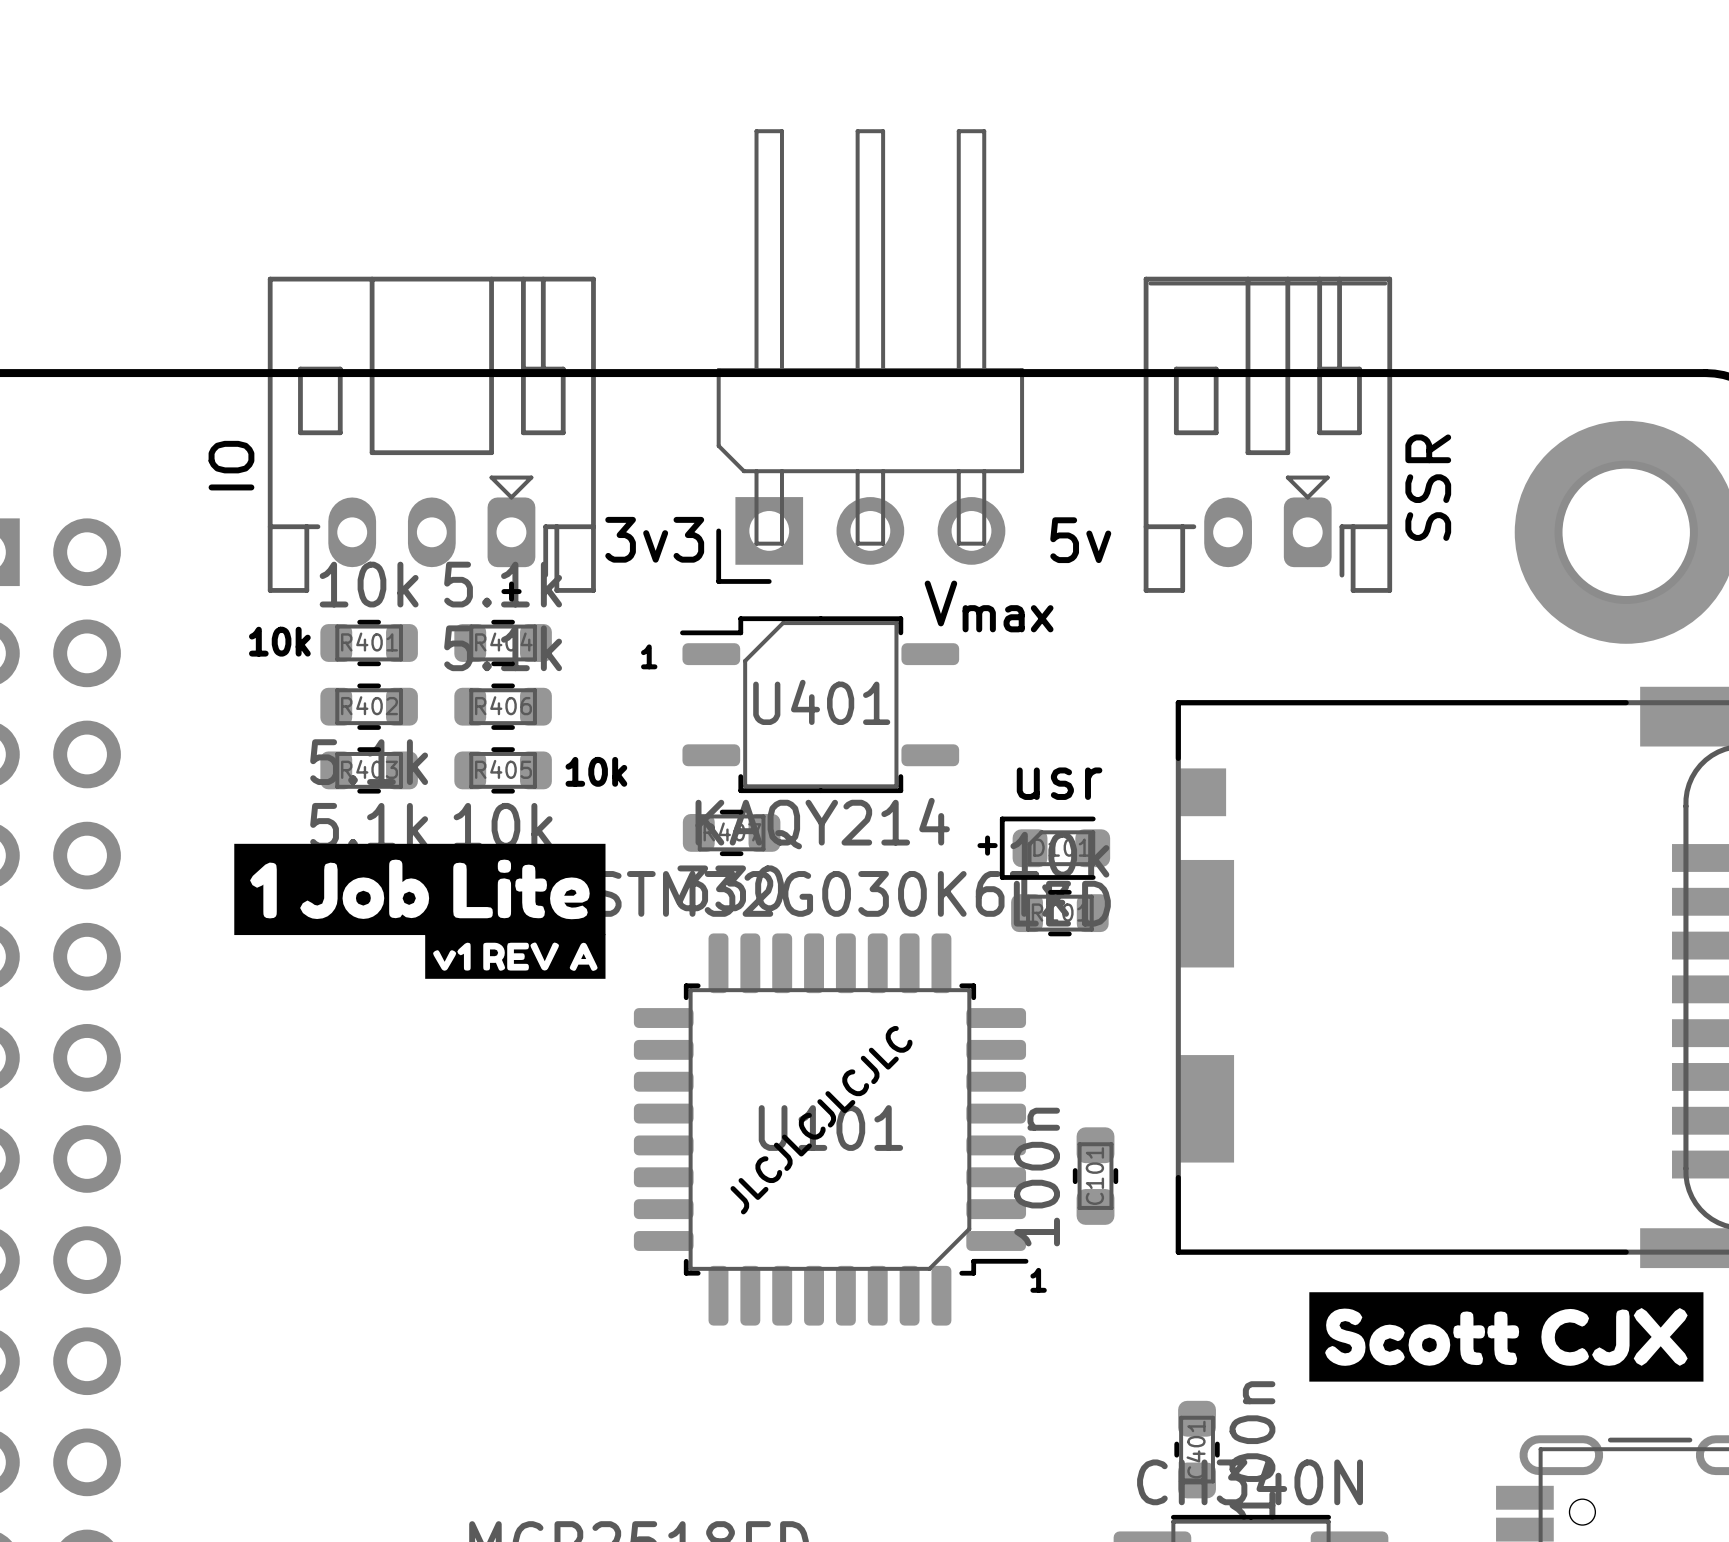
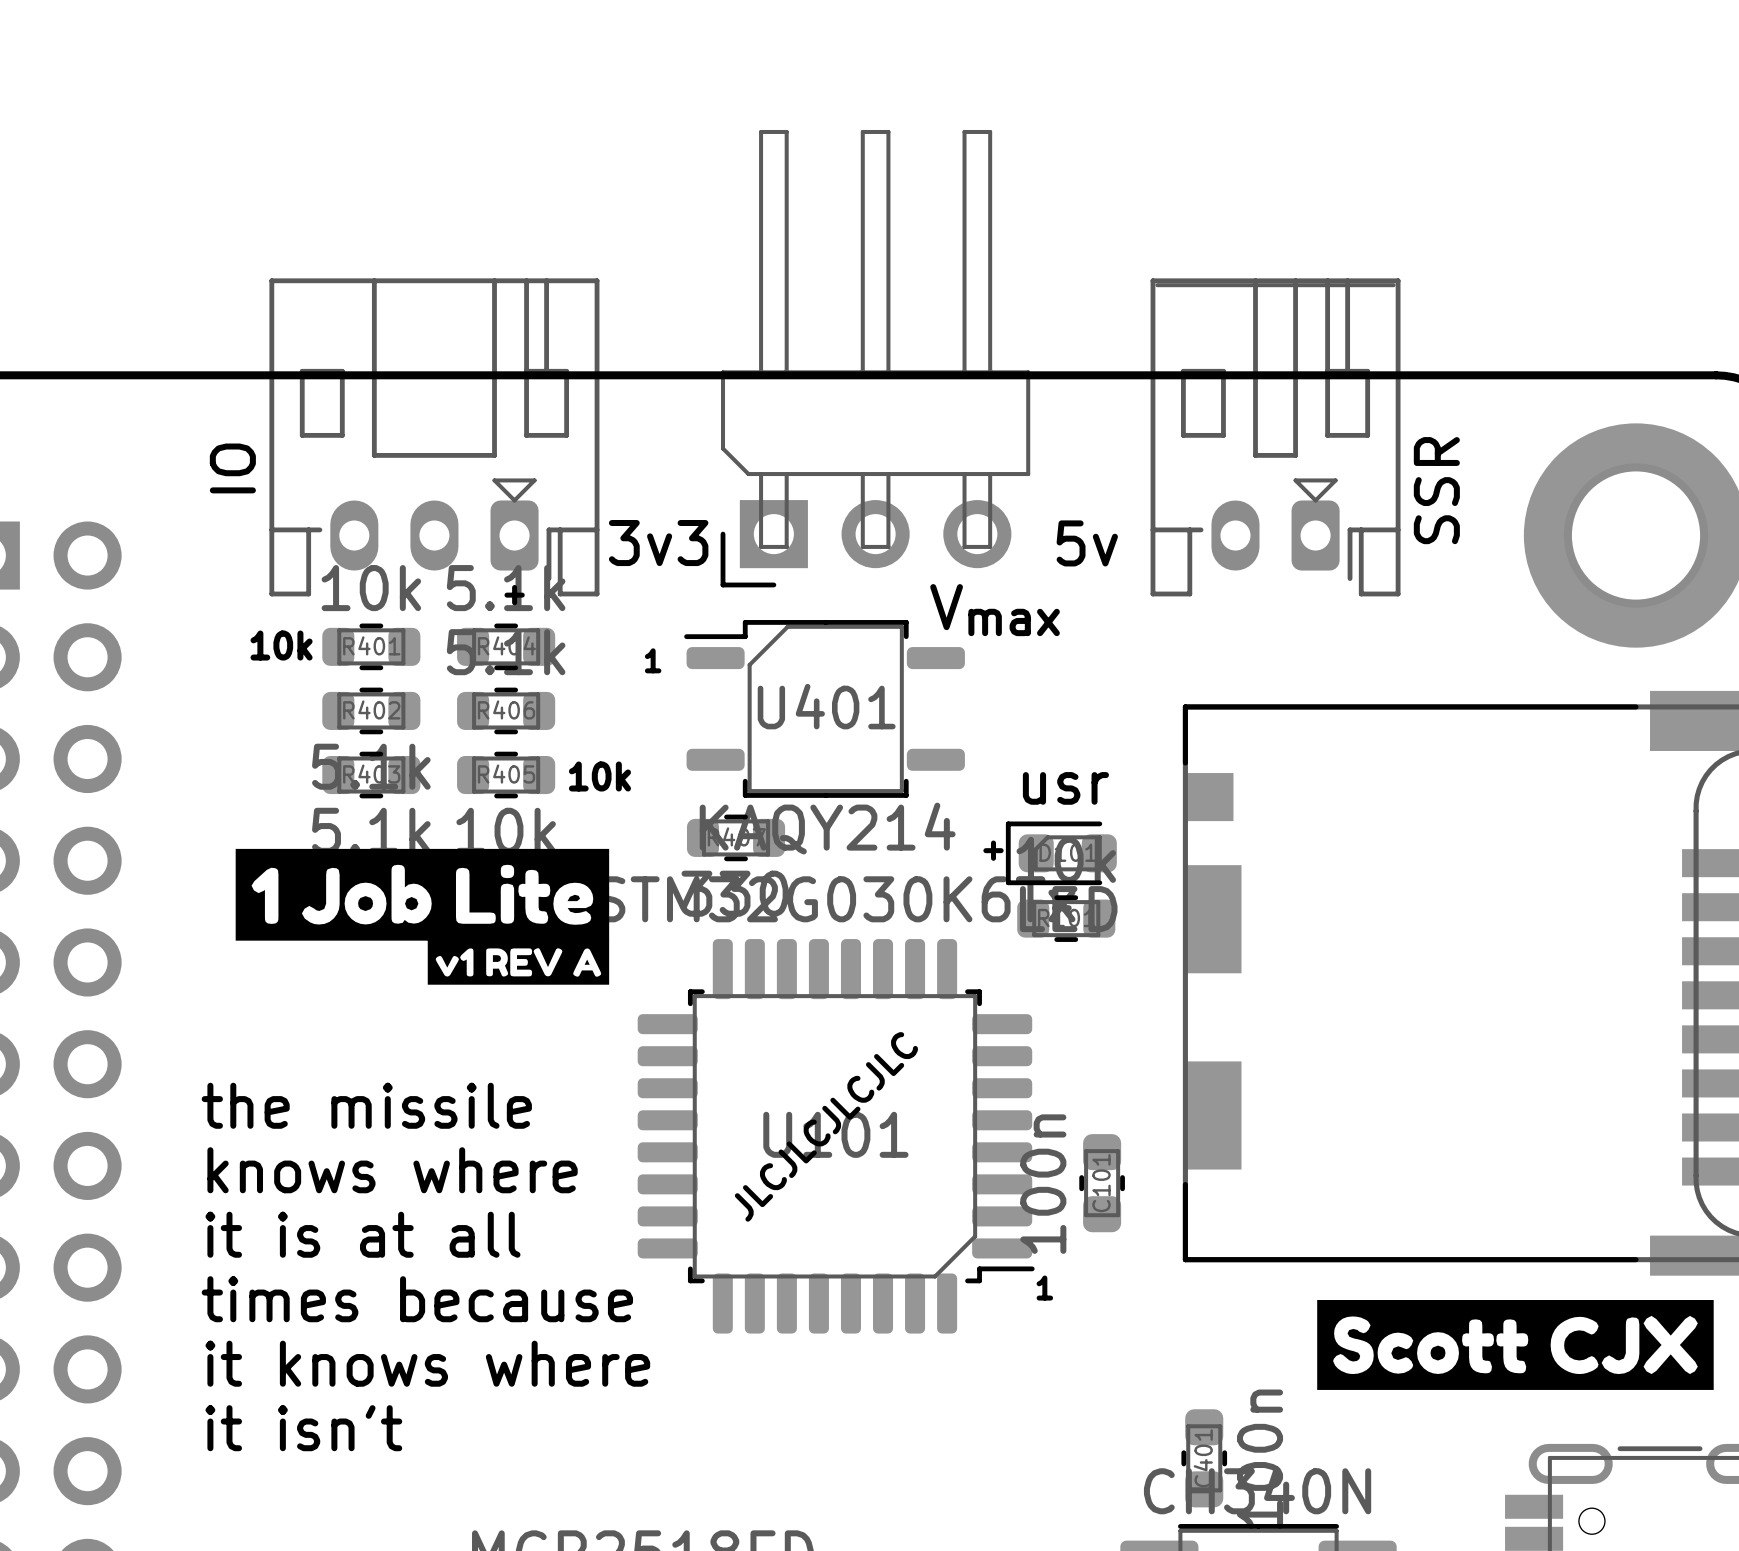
text: none -> the missile (366, 1105)
text: none -> knows where (392, 1170)
text: none -> it is at all (362, 1234)
text: none -> times because (417, 1299)
text: none -> it knows where (427, 1363)
text: none -> it isn't (303, 1428)

